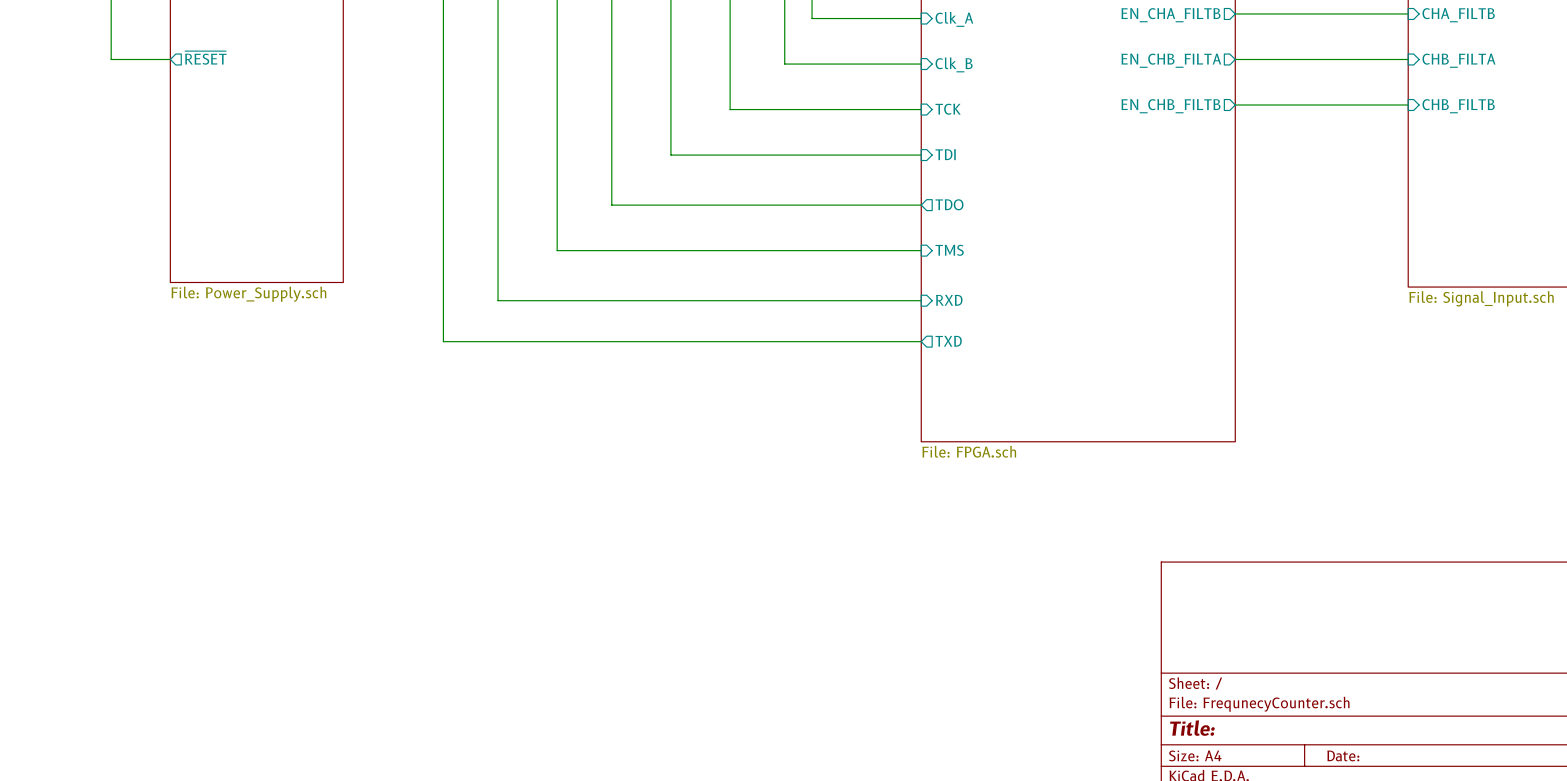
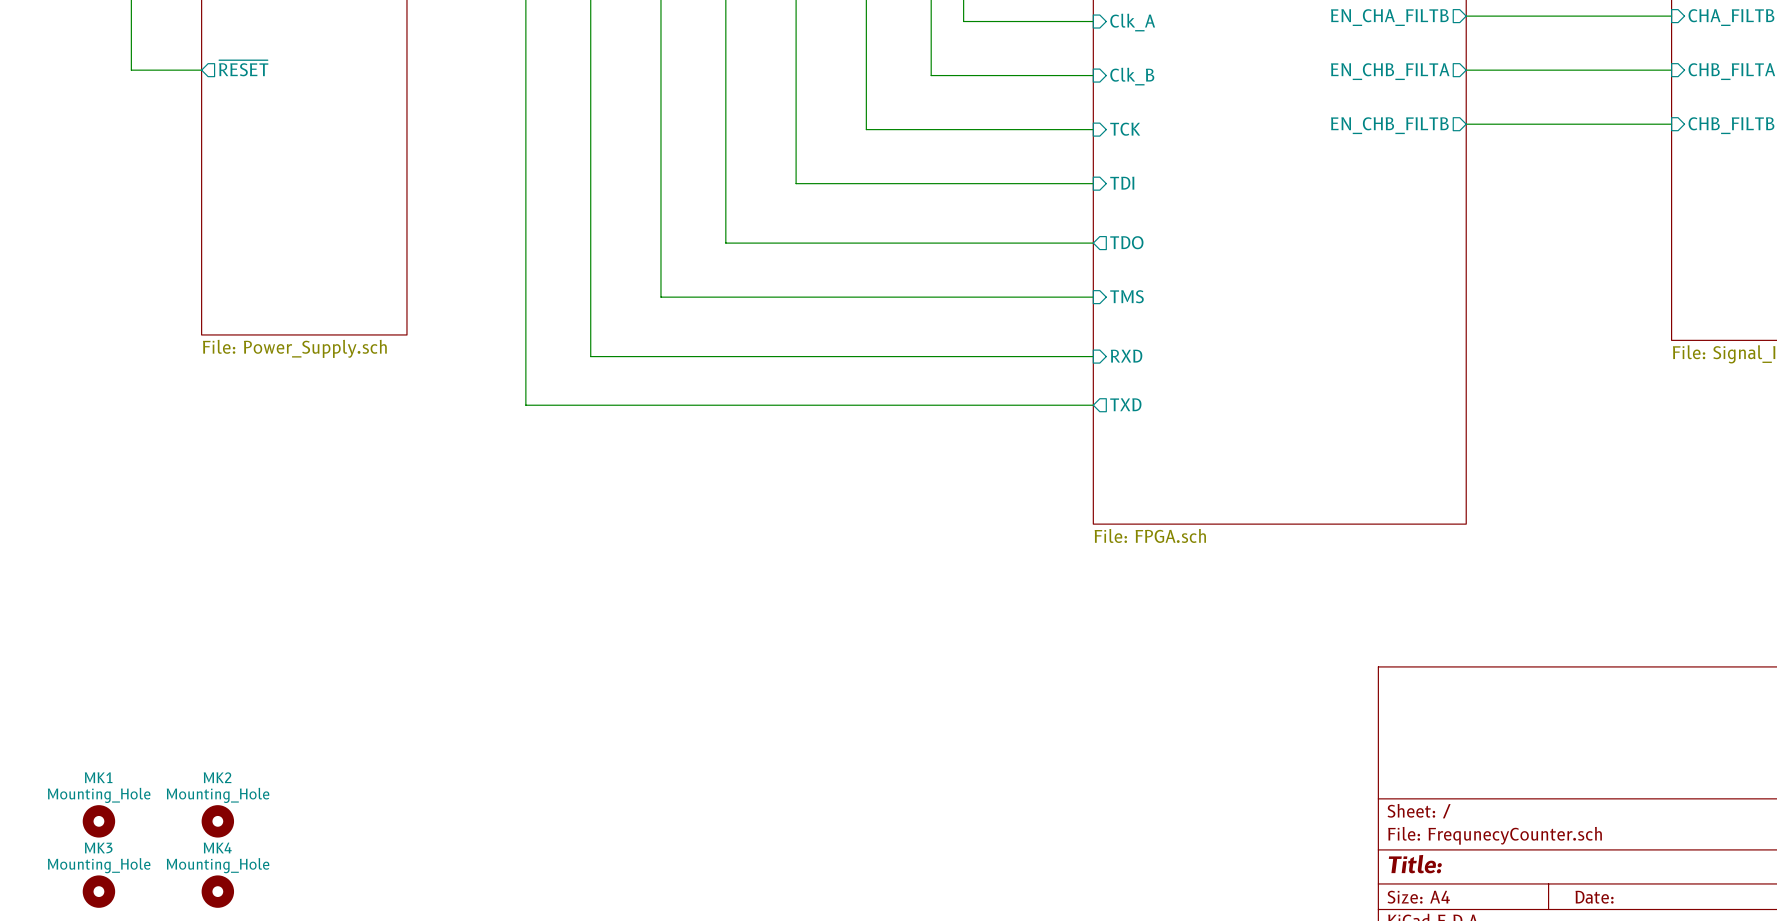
MK1: none -> Mounting_Hole (98, 821)
MK2: none -> Mounting_Hole (217, 821)
MK3: none -> Mounting_Hole (98, 891)
MK4: none -> Mounting_Hole (217, 891)

